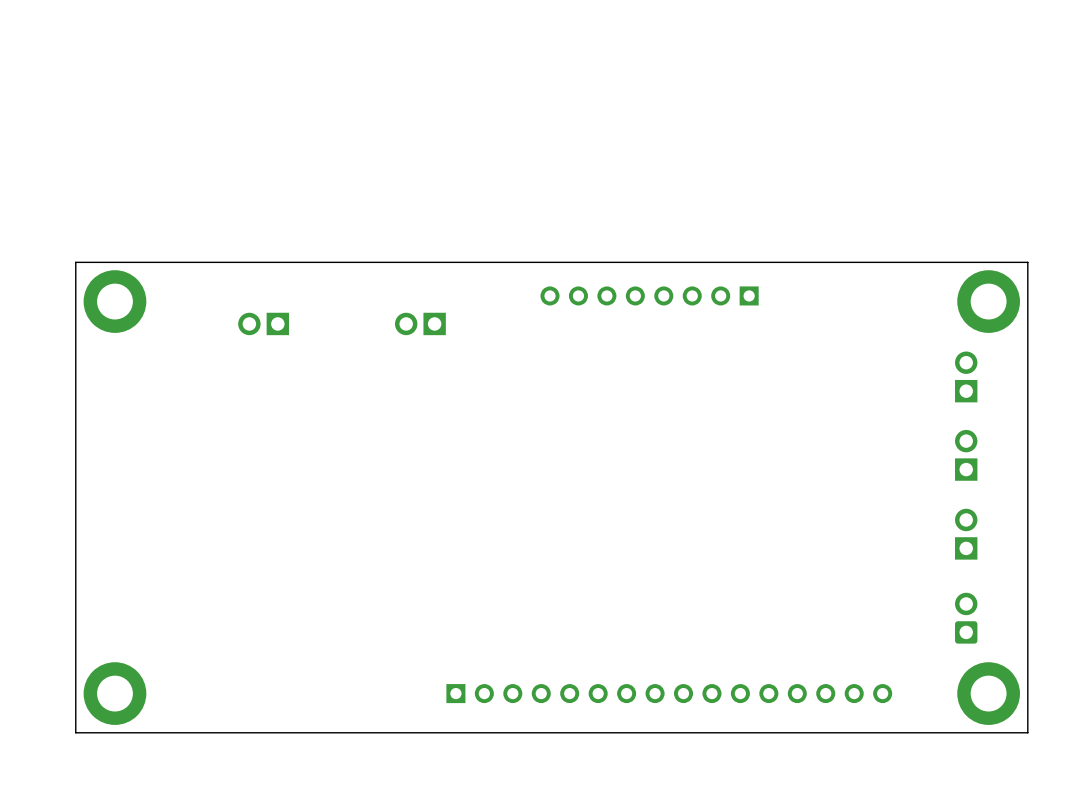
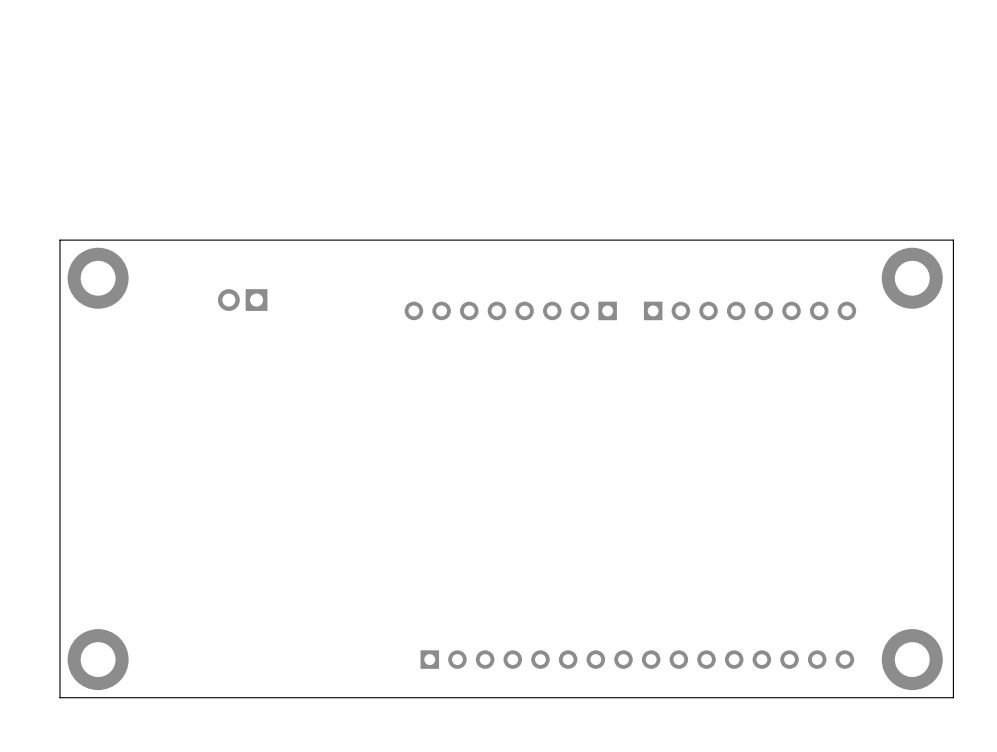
board edge: (994, 262) (1027, 262) (1027, 732) (994, 732) -> (953, 240) (953, 697)
part: (649, 295) -> none
part position: (988, 301) -> (912, 278)
part: (420, 323) -> none
part: none -> (510, 310)
part: none -> (750, 310)
part: (966, 376) -> none
part: (966, 455) -> none
part: (966, 534) -> none
part: (966, 618) -> none
part position: (988, 693) -> (912, 659)

